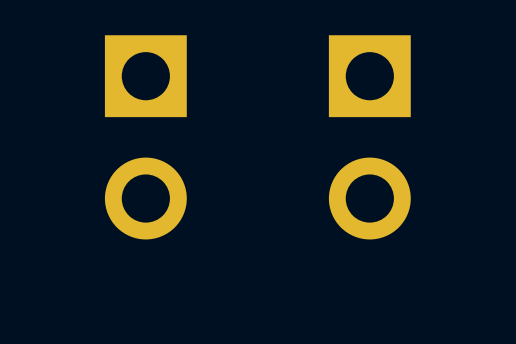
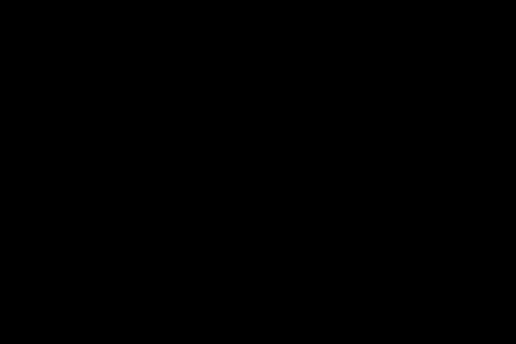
part: (145, 137) -> none
part: (369, 137) -> none

